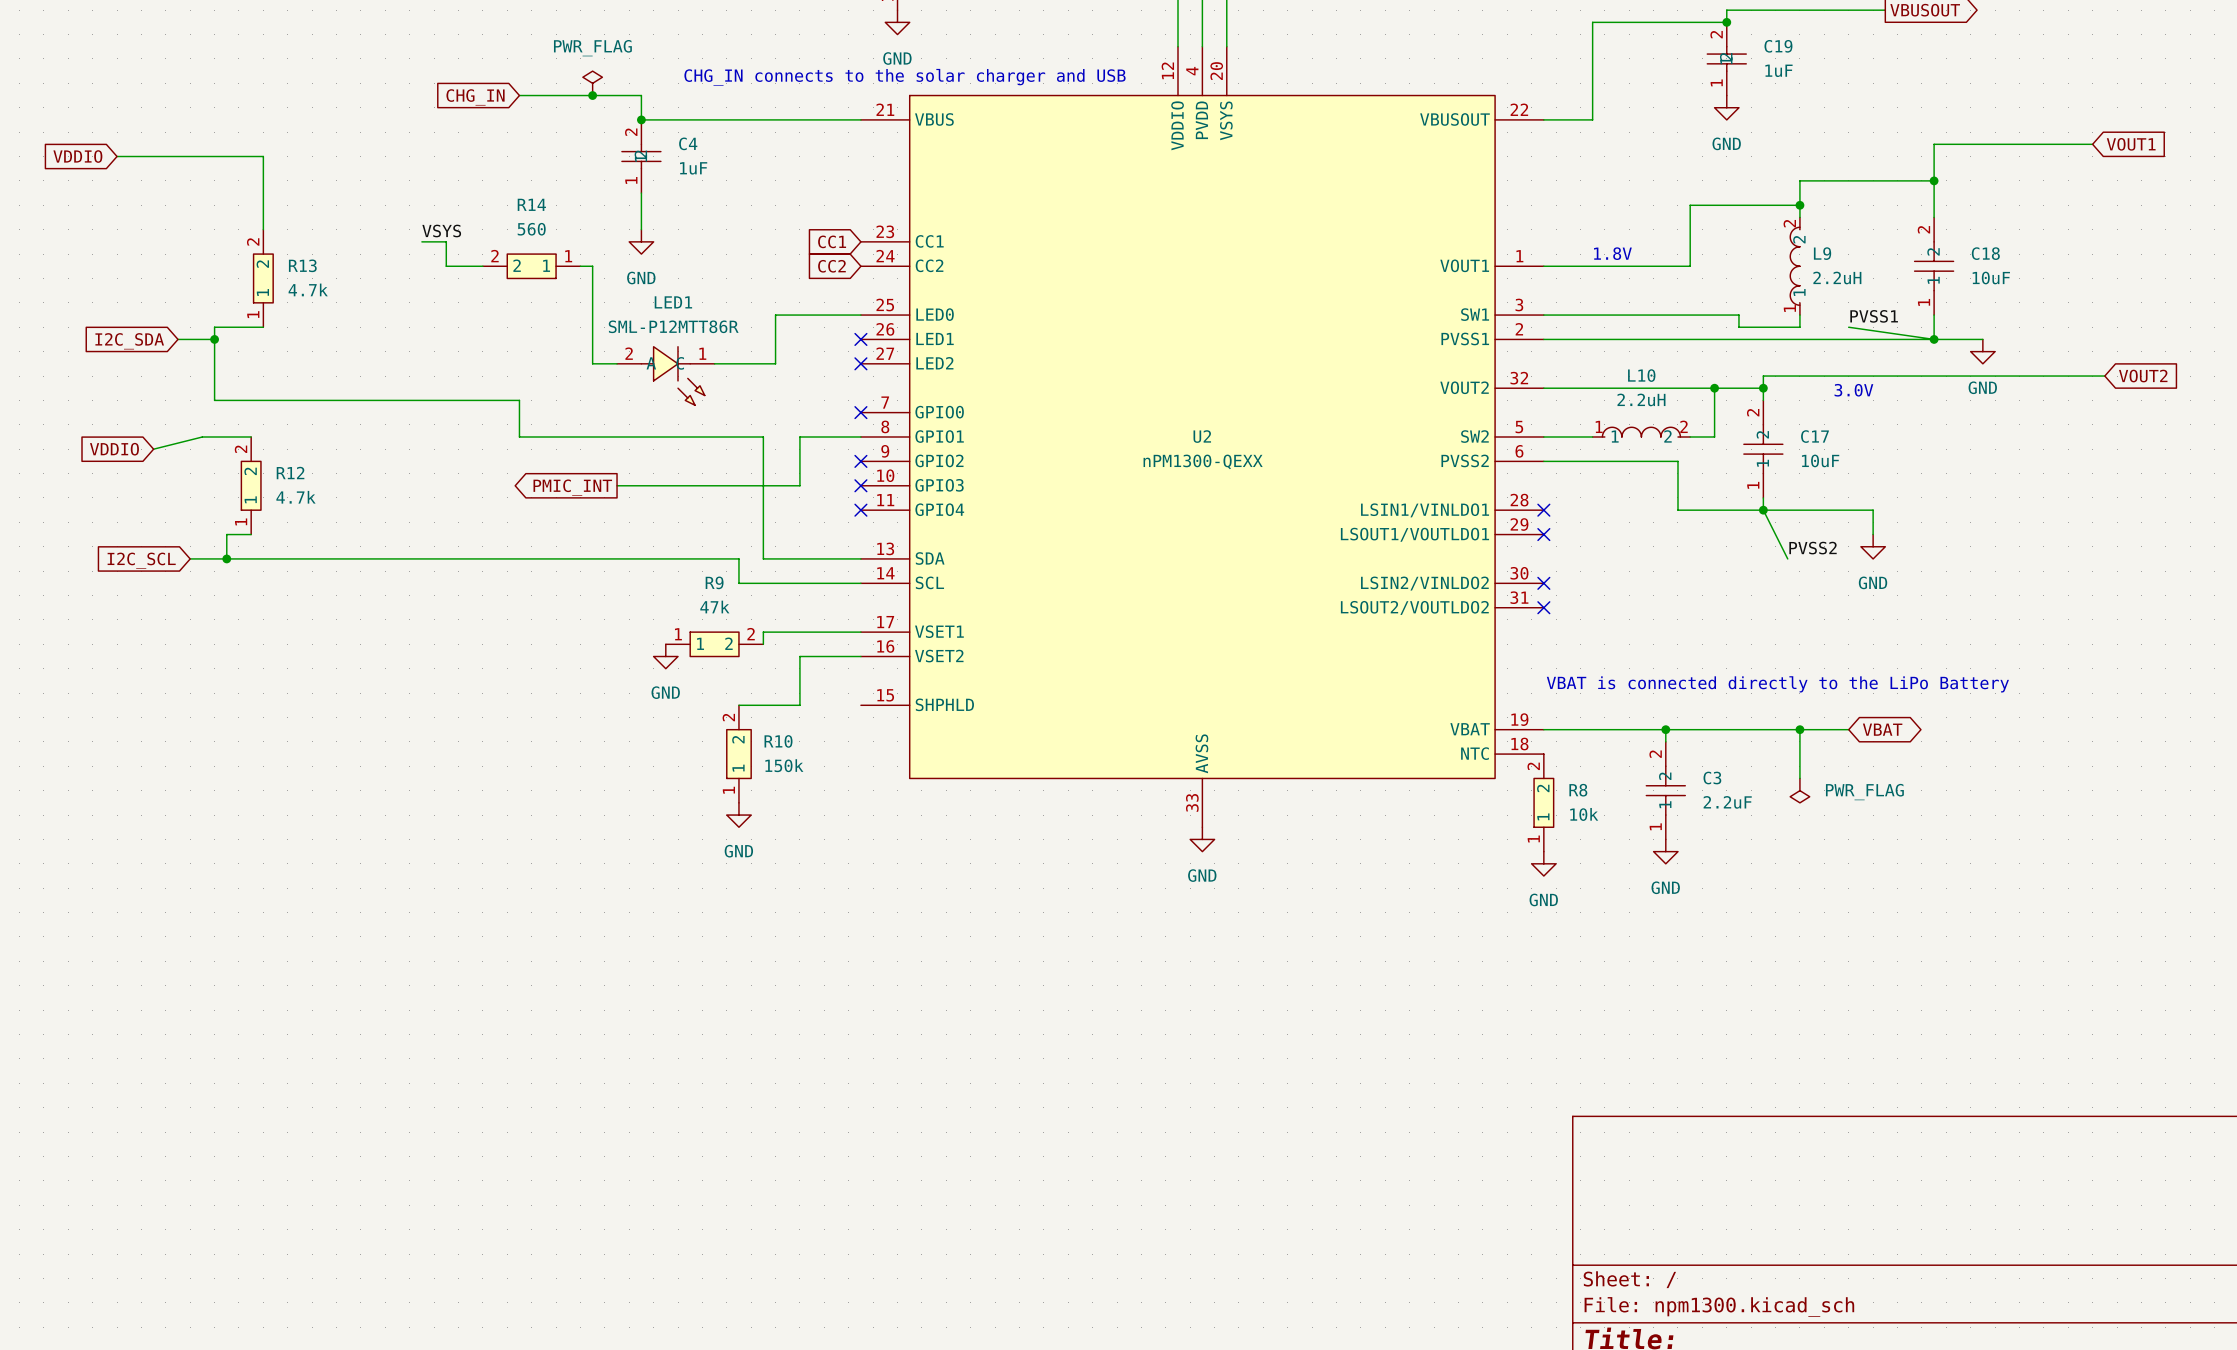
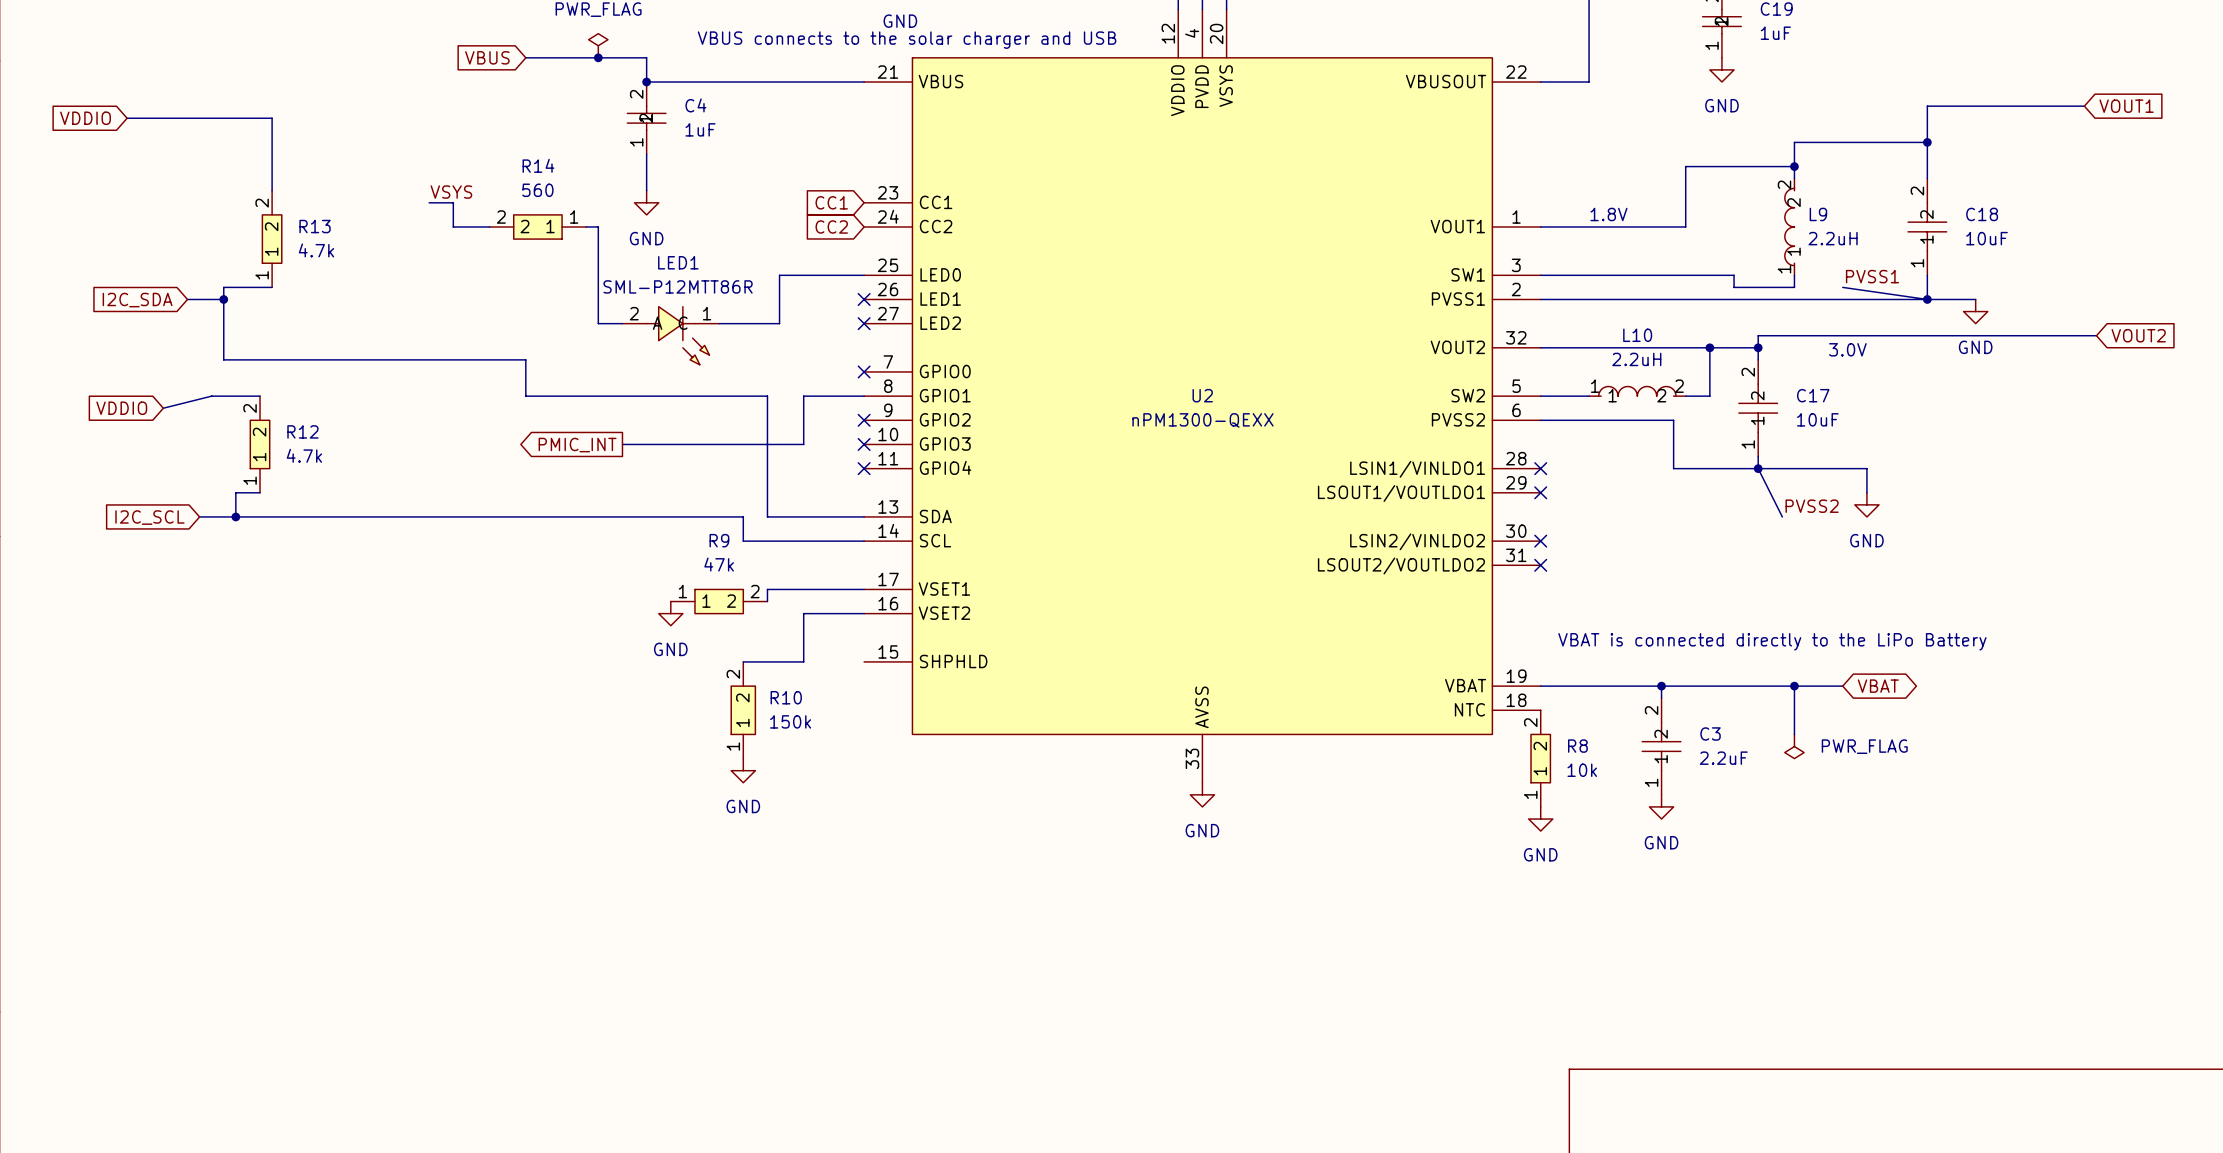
text: CHG_IN connects to the solar charger and USB (905, 77) -> VBUS connects to the solar charger and USB (907, 40)
global label: CHG_IN (475, 97) -> VBUS (487, 57)

